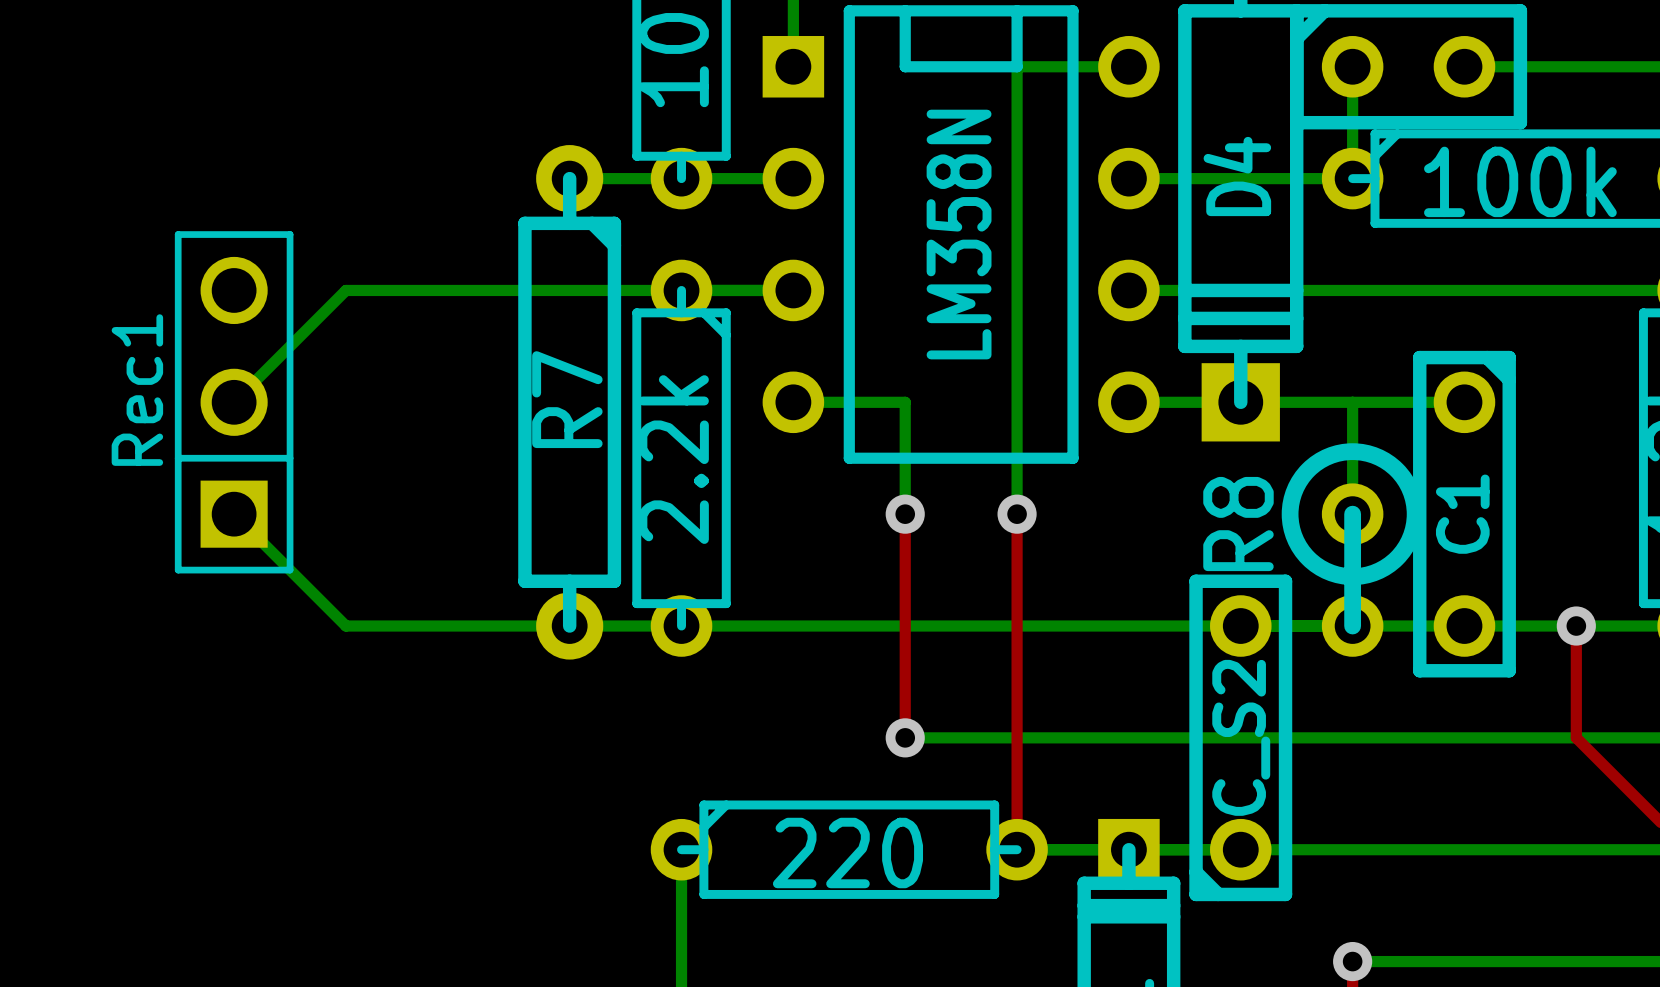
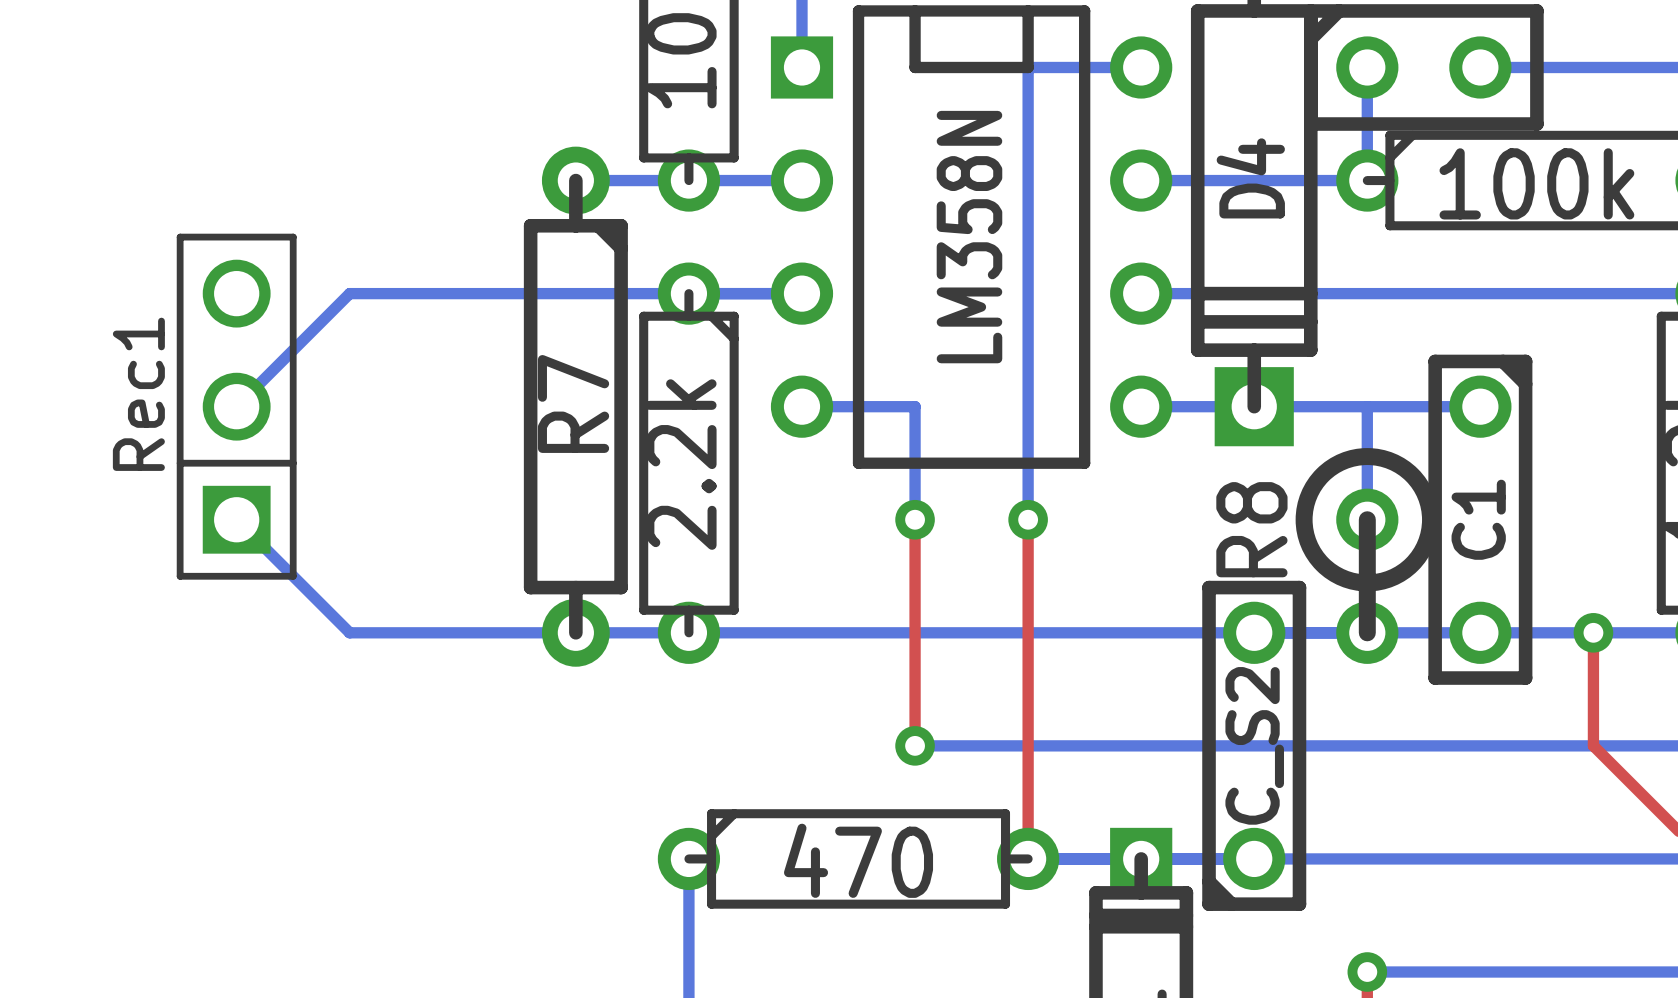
part value: 220 (847, 853) -> 470 (858, 860)

